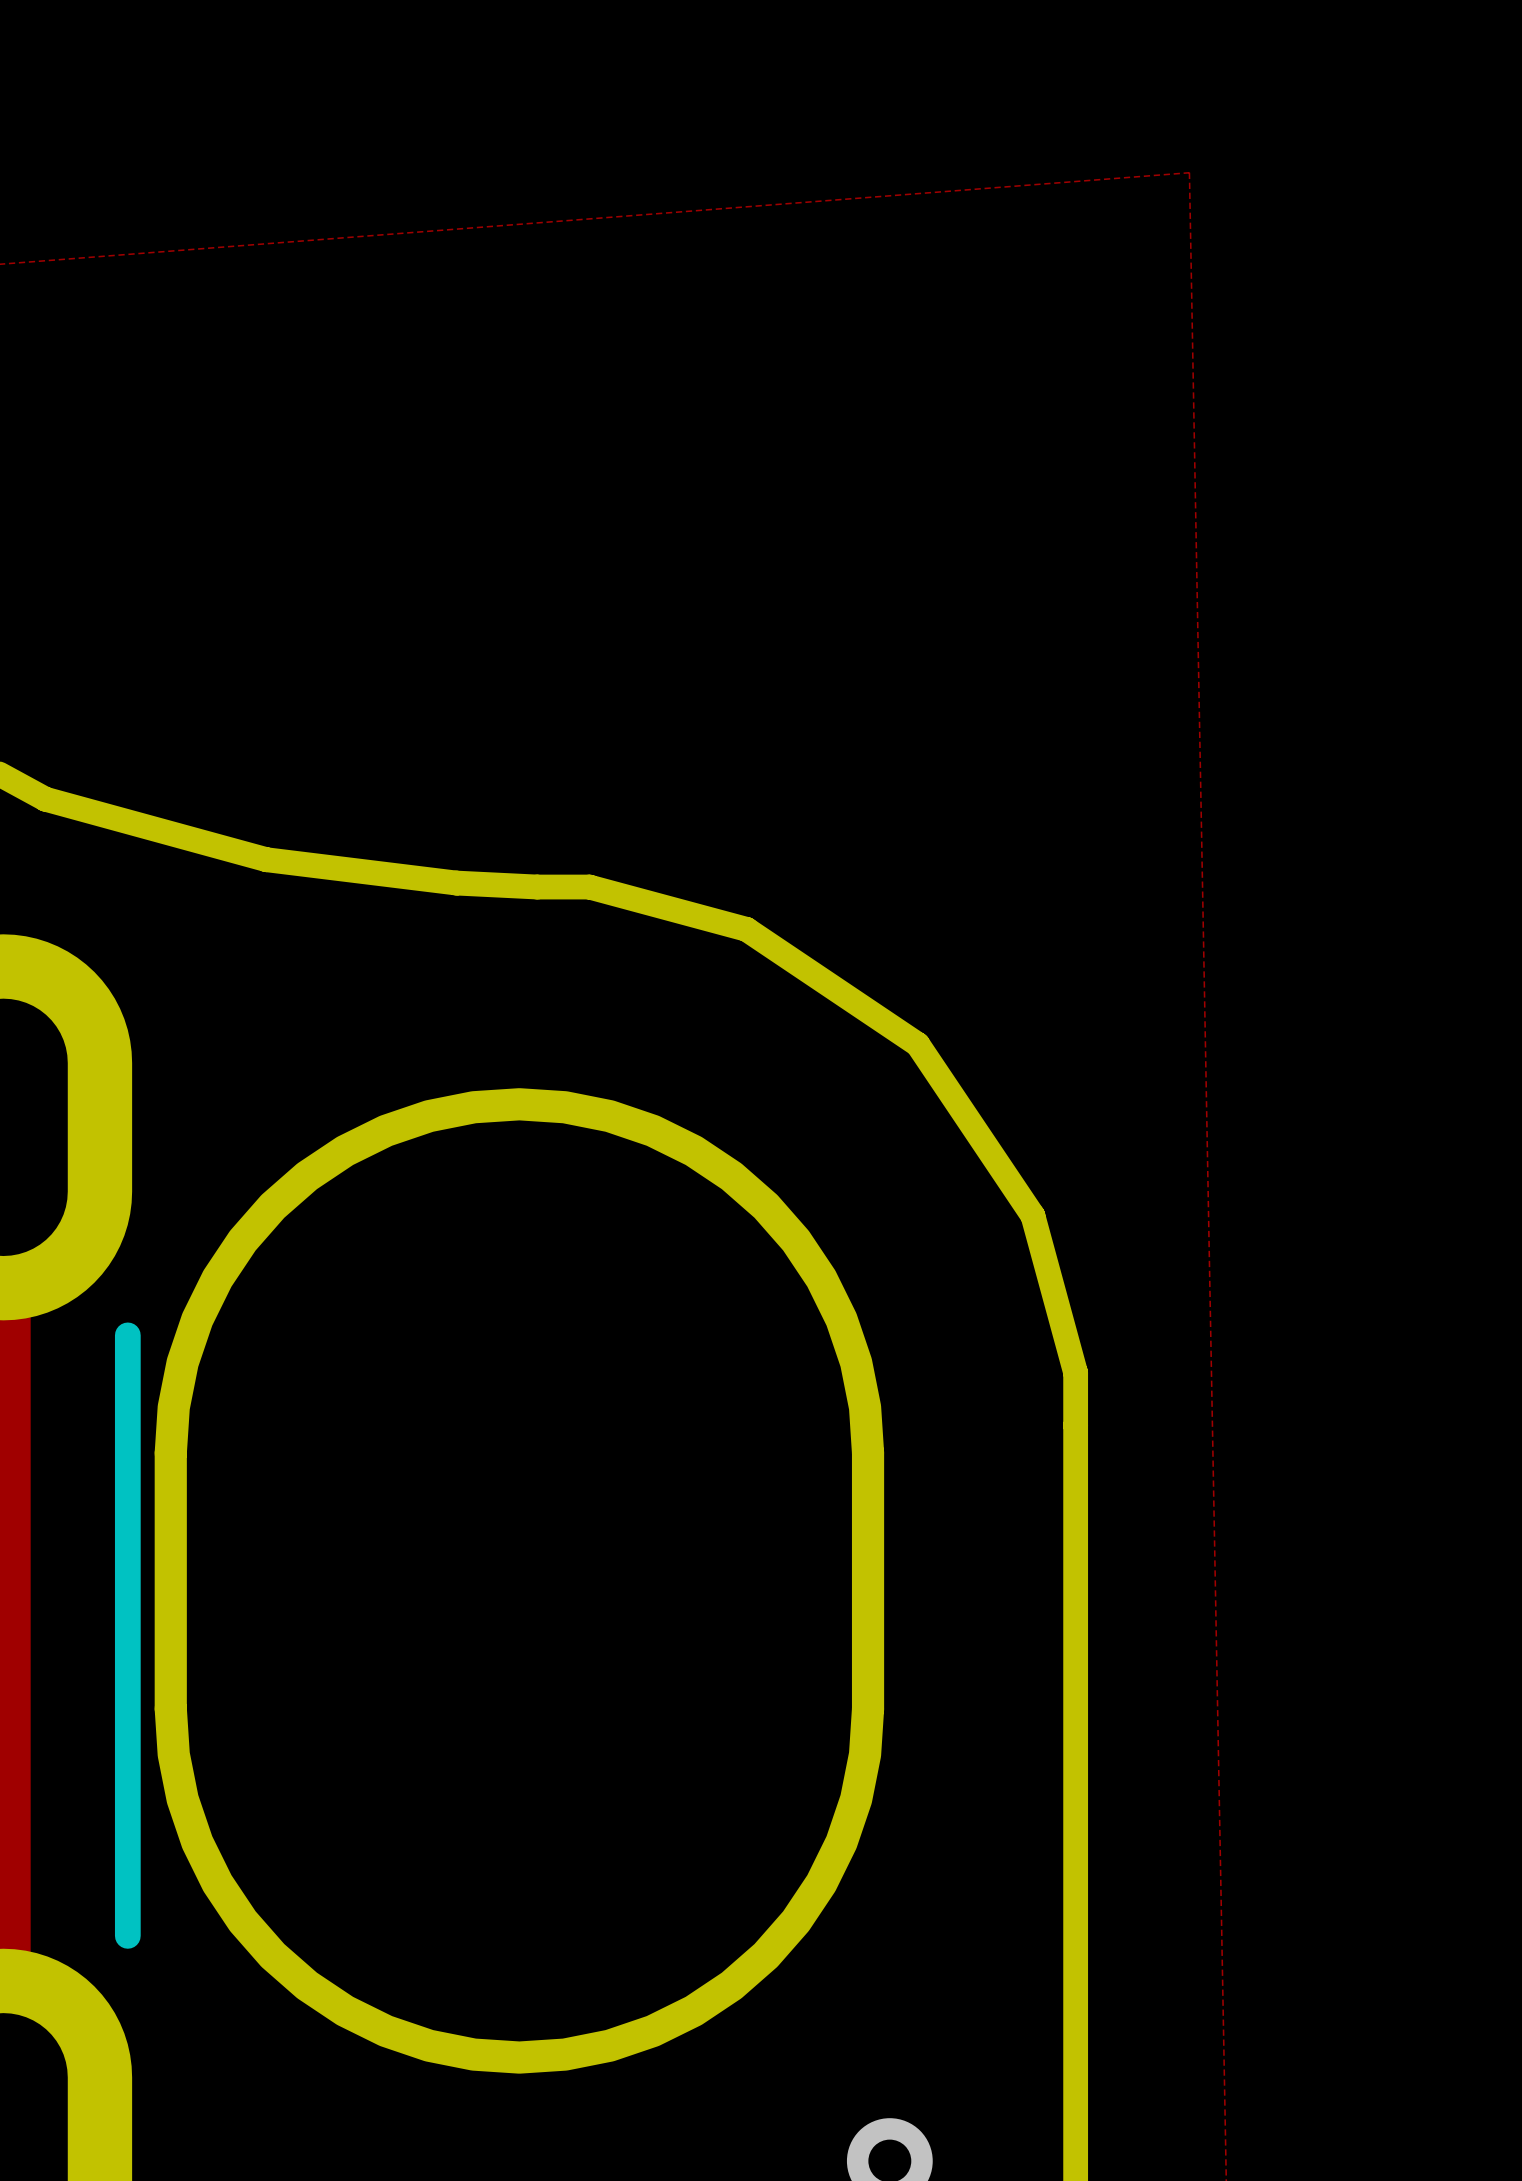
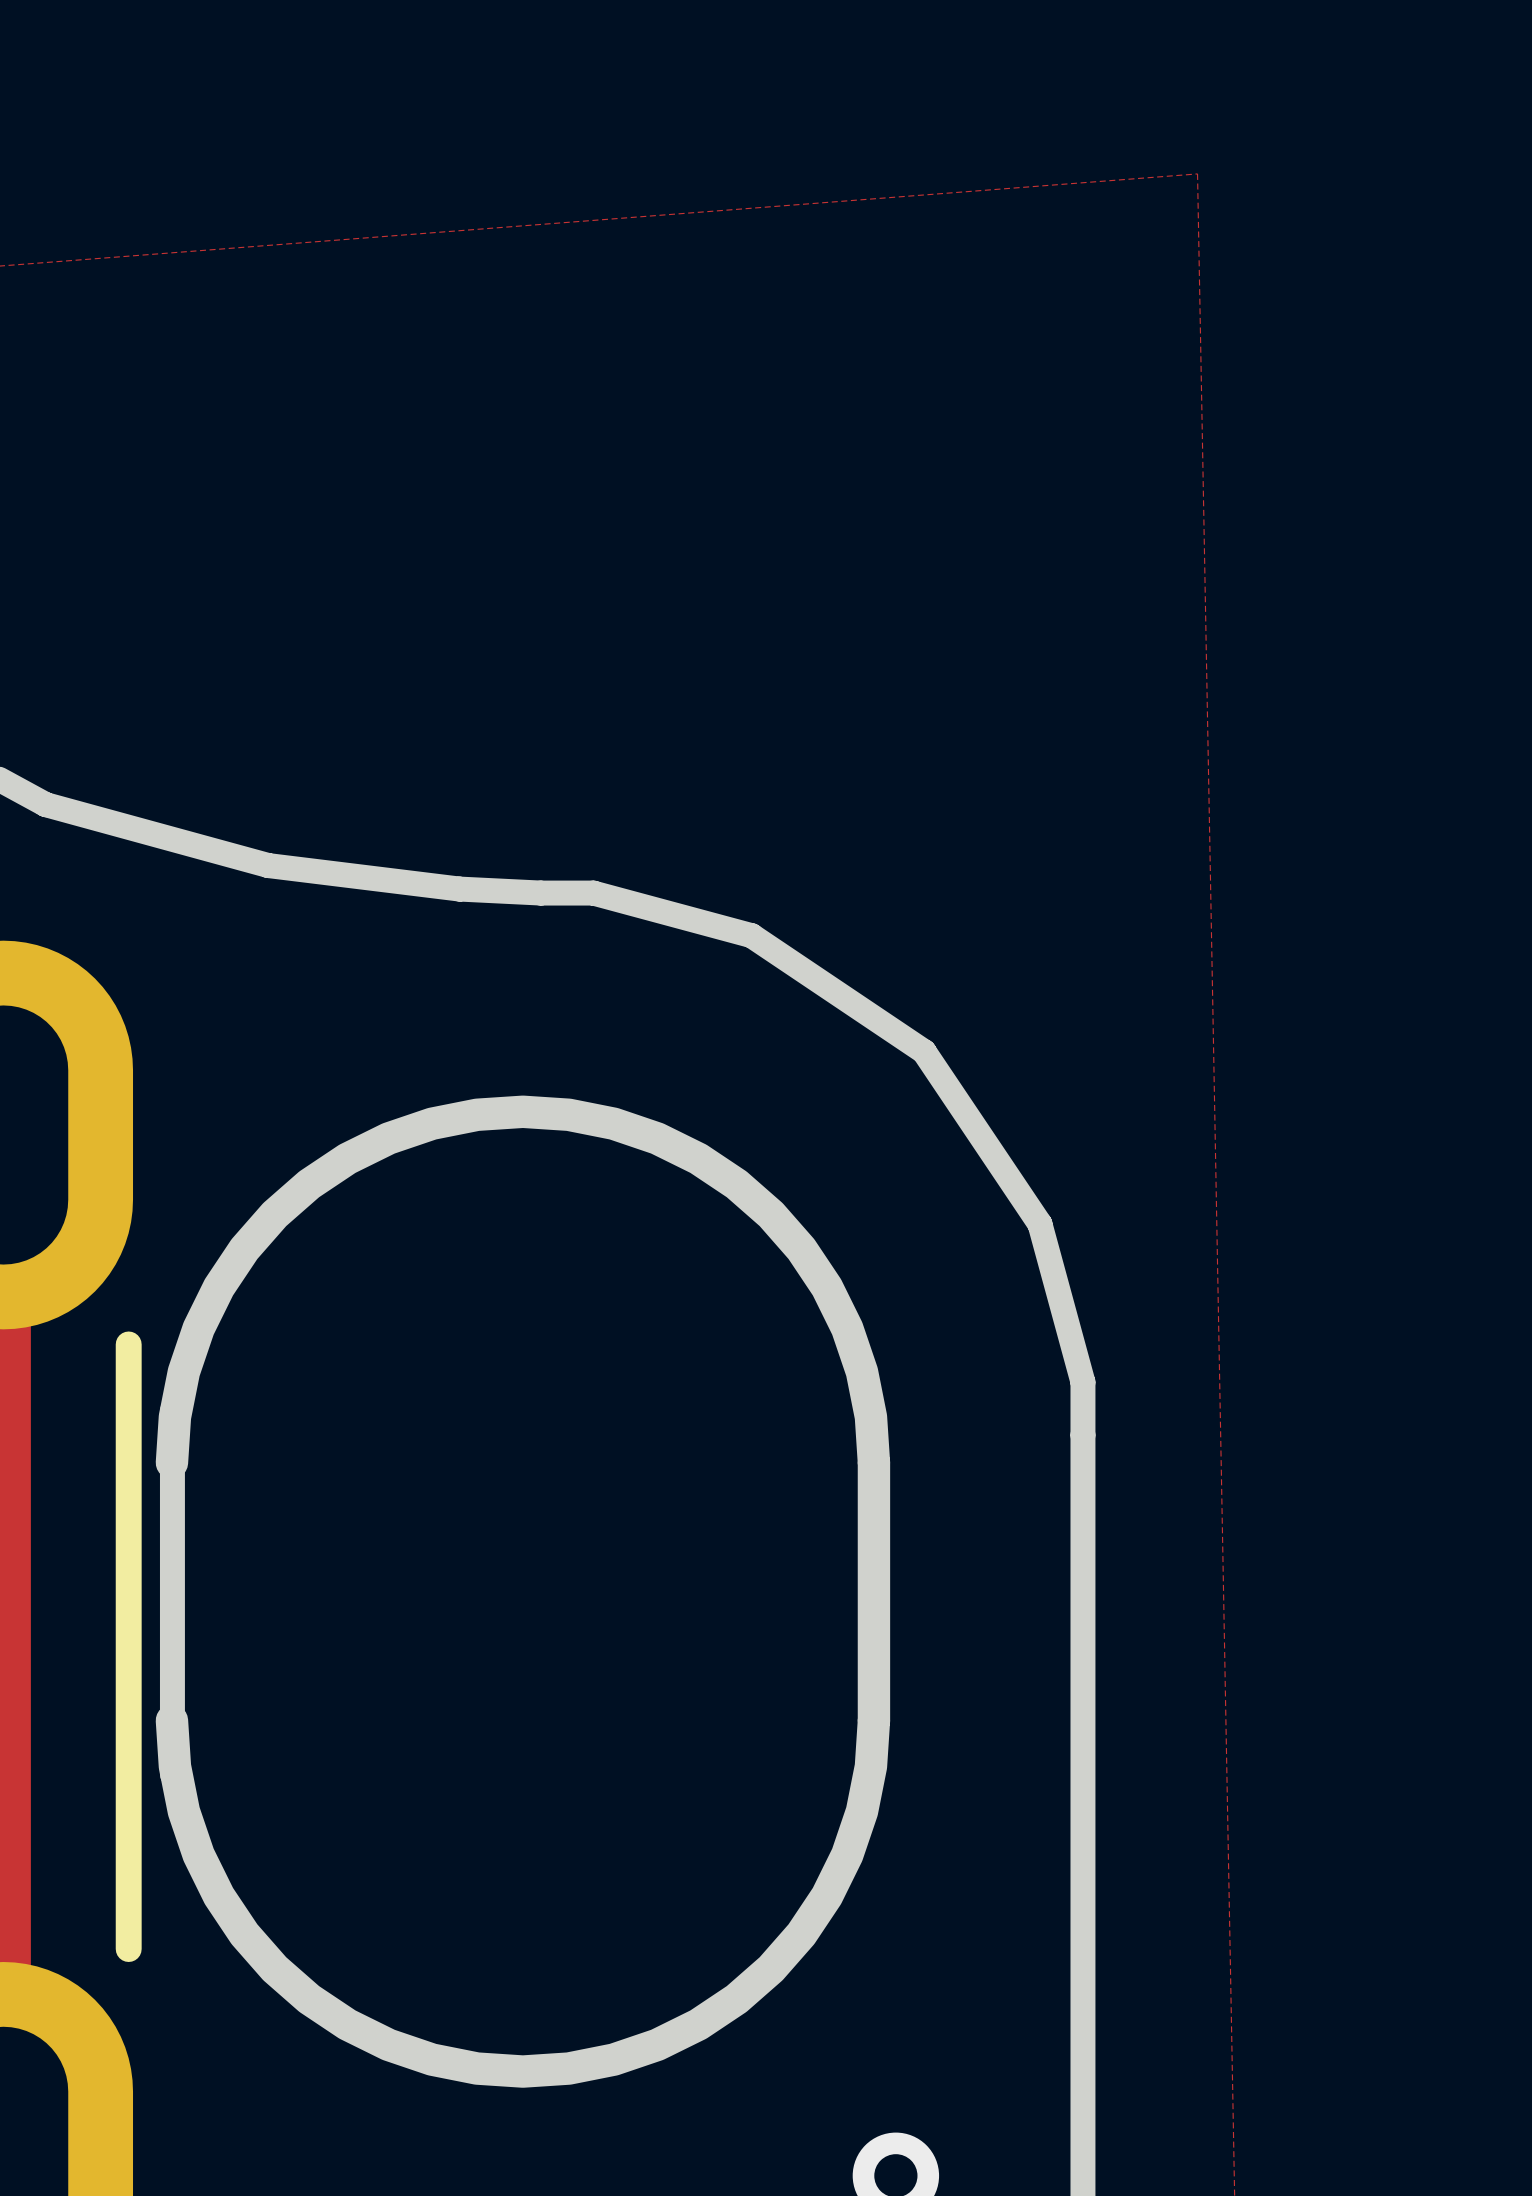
board edge width: thick (170, 1452) (170, 1708) -> thin (171, 1462) (171, 1720)

